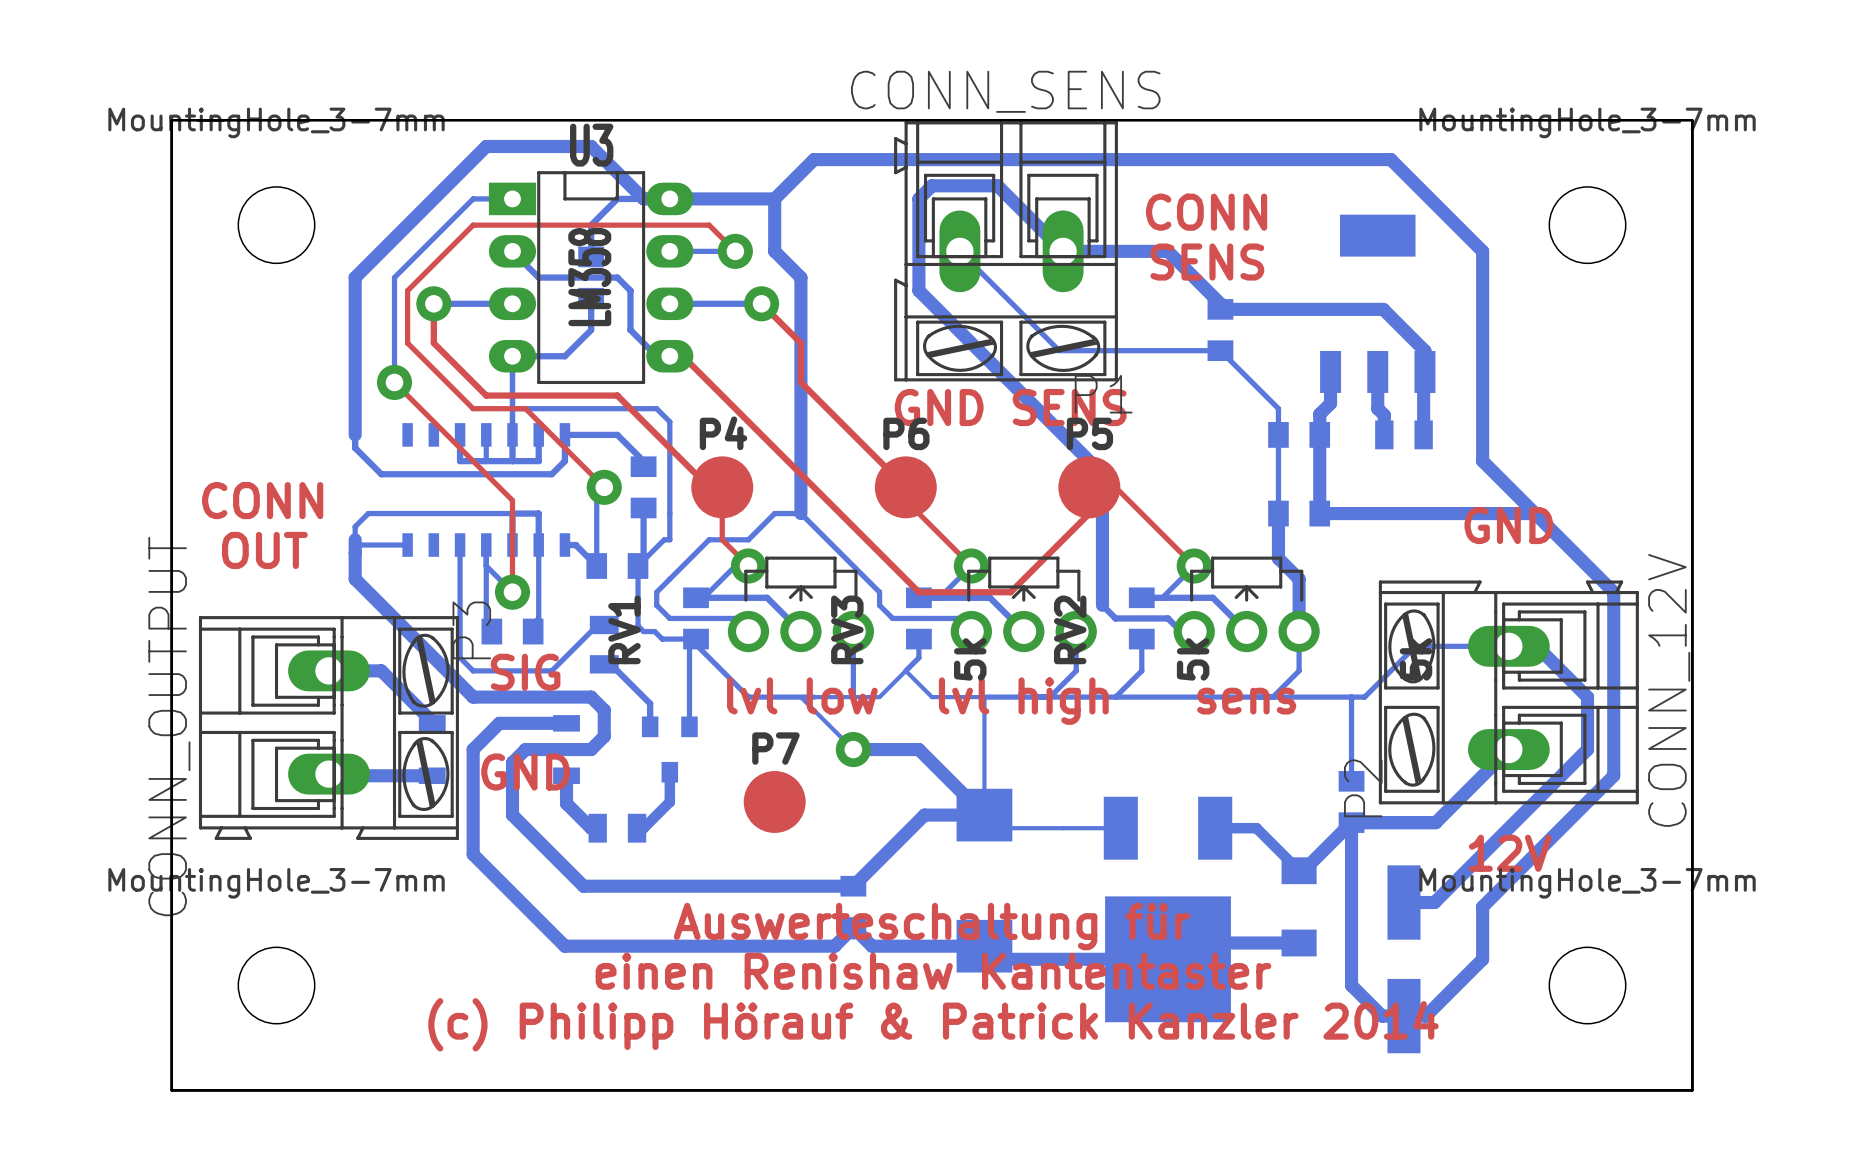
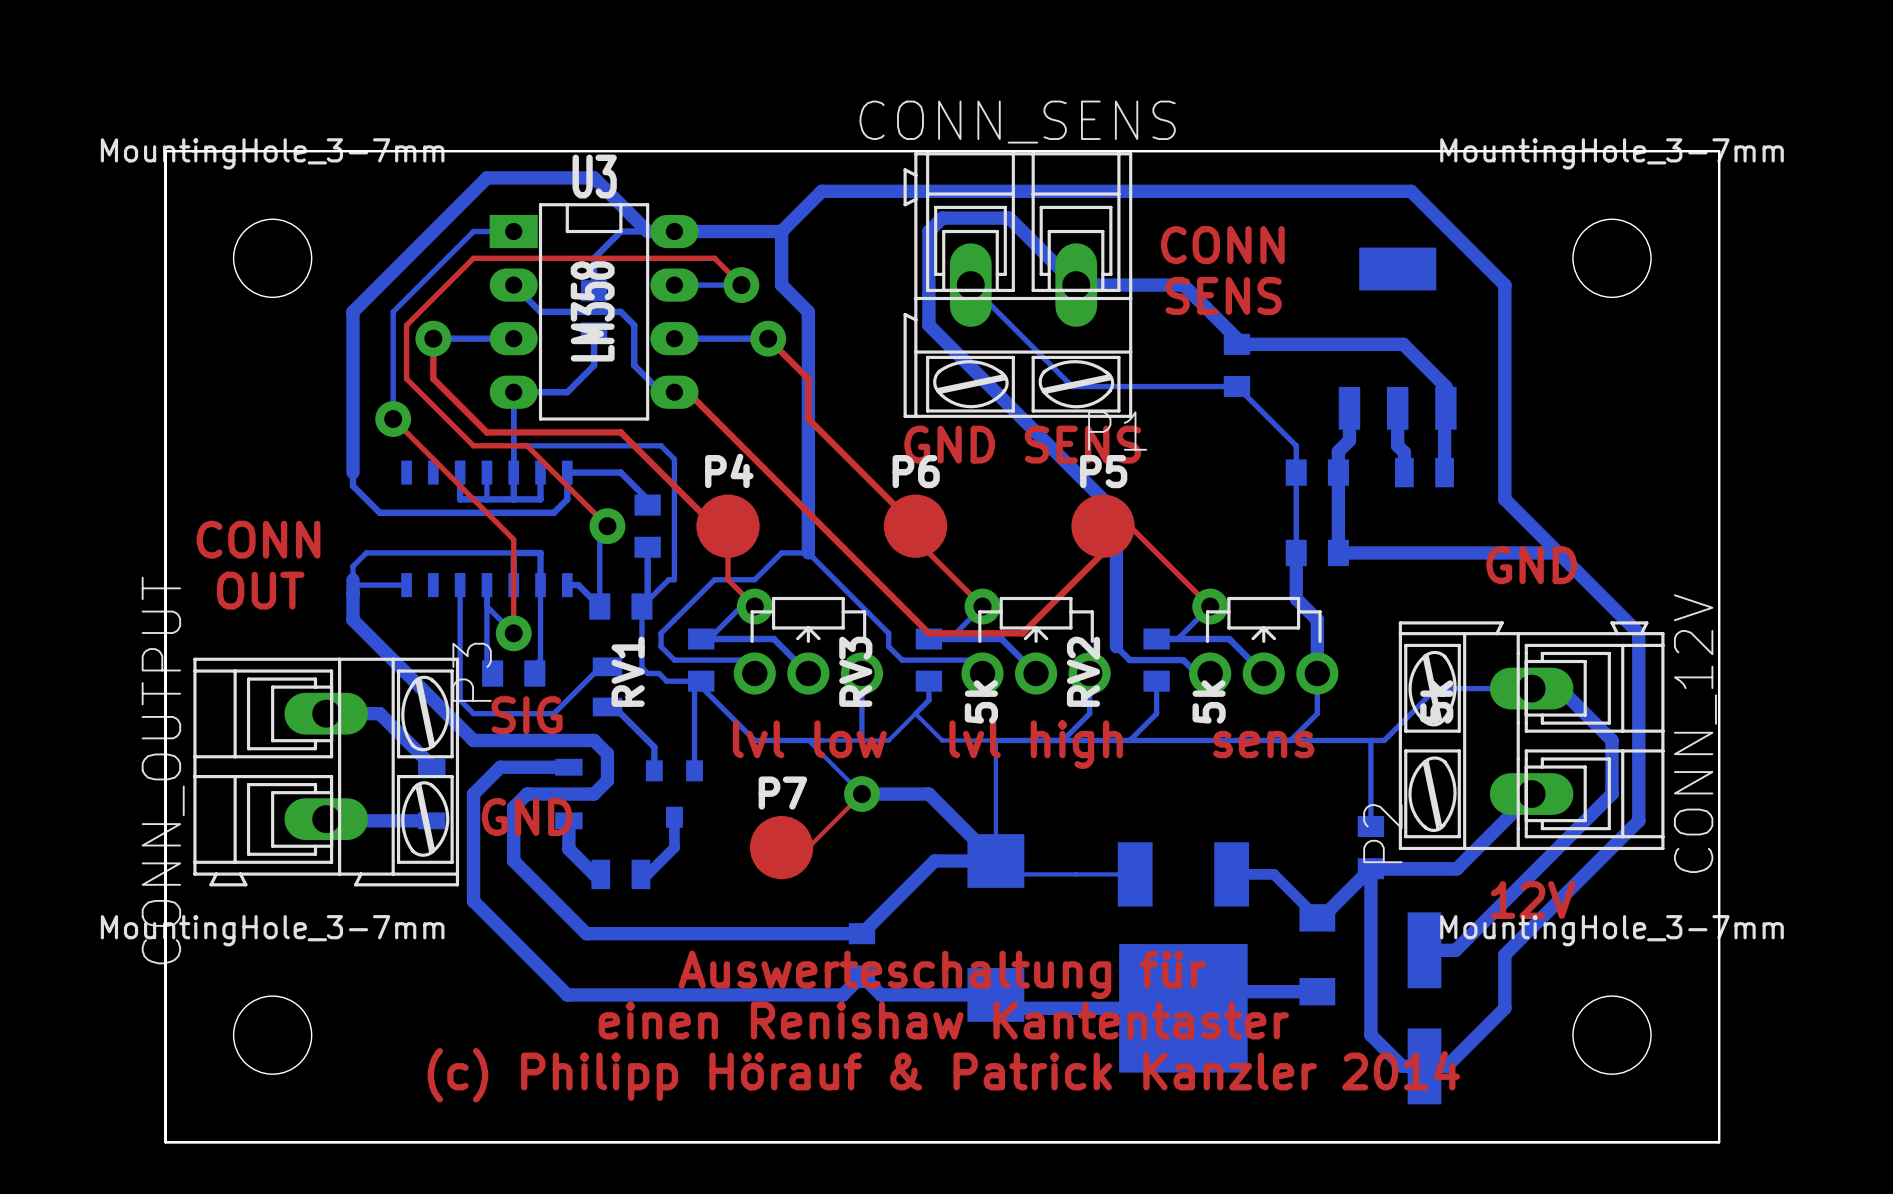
top track: none -> (861, 794) (808, 847)

